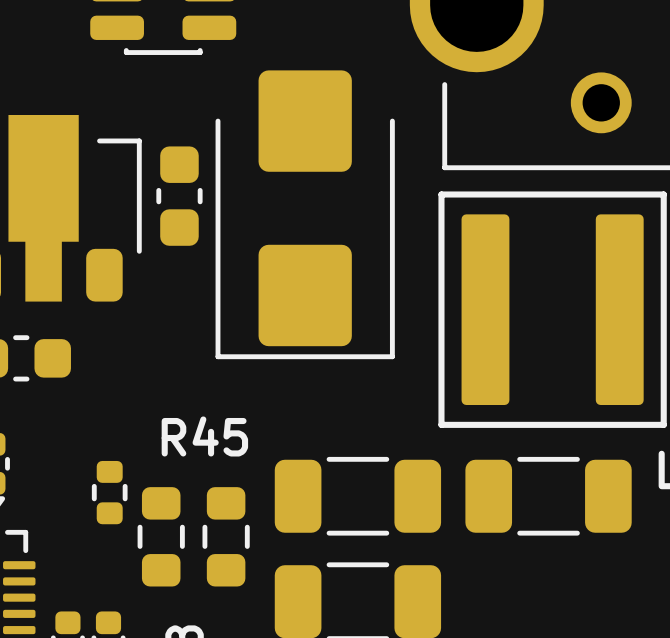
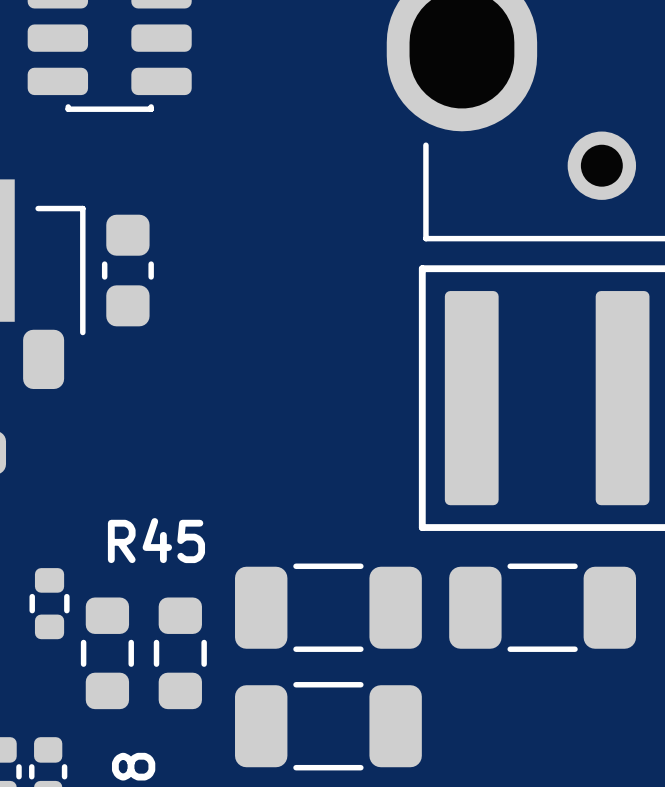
part: (305, 214) -> none

